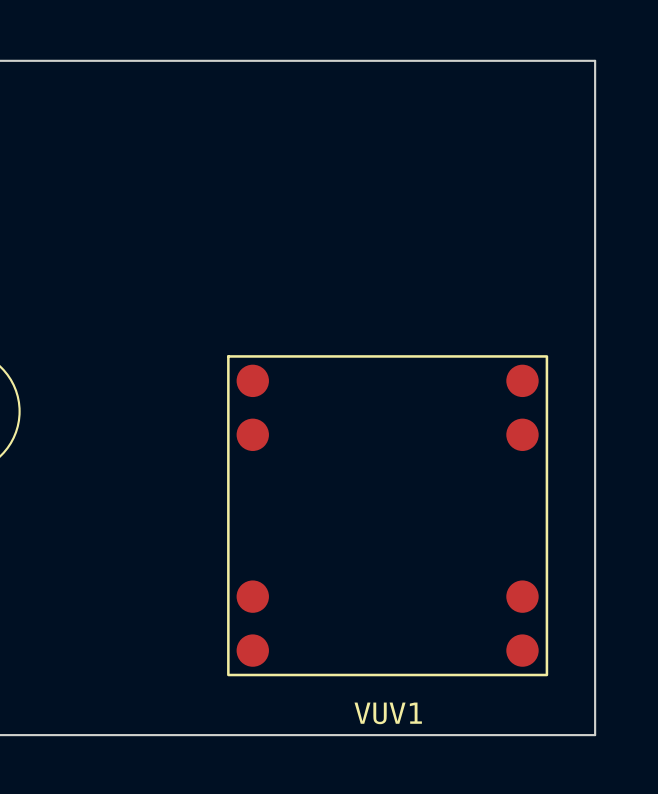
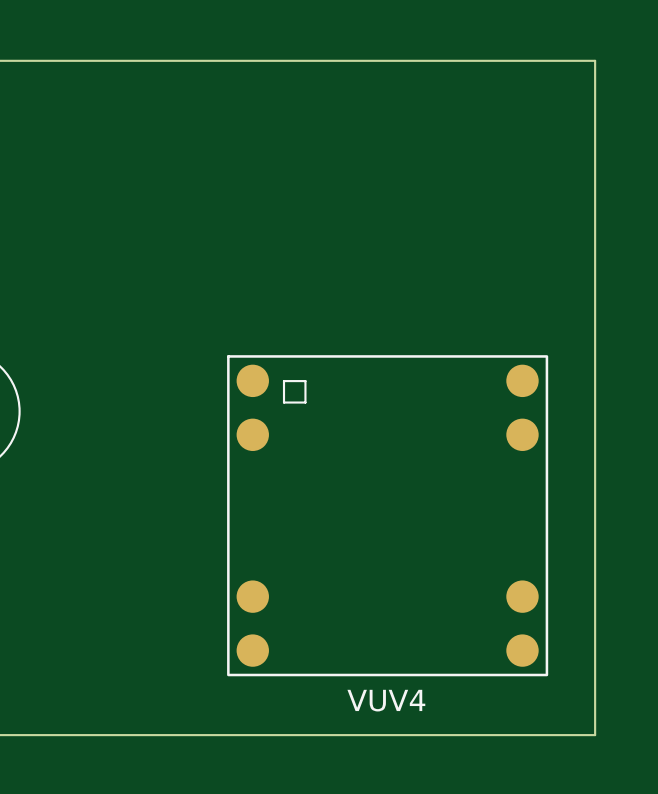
line: none -> (284, 381) (305, 381) (305, 402) (284, 402) (284, 381)
VUV1 name: VUV1 (388, 713) -> VUV4 (386, 700)

